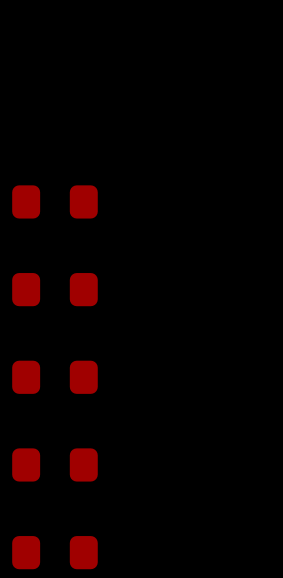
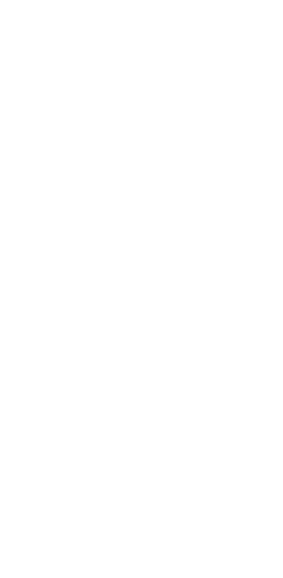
part: (54, 201) -> none
part: (54, 289) -> none
part: (54, 377) -> none
part: (54, 464) -> none
part: (54, 552) -> none

